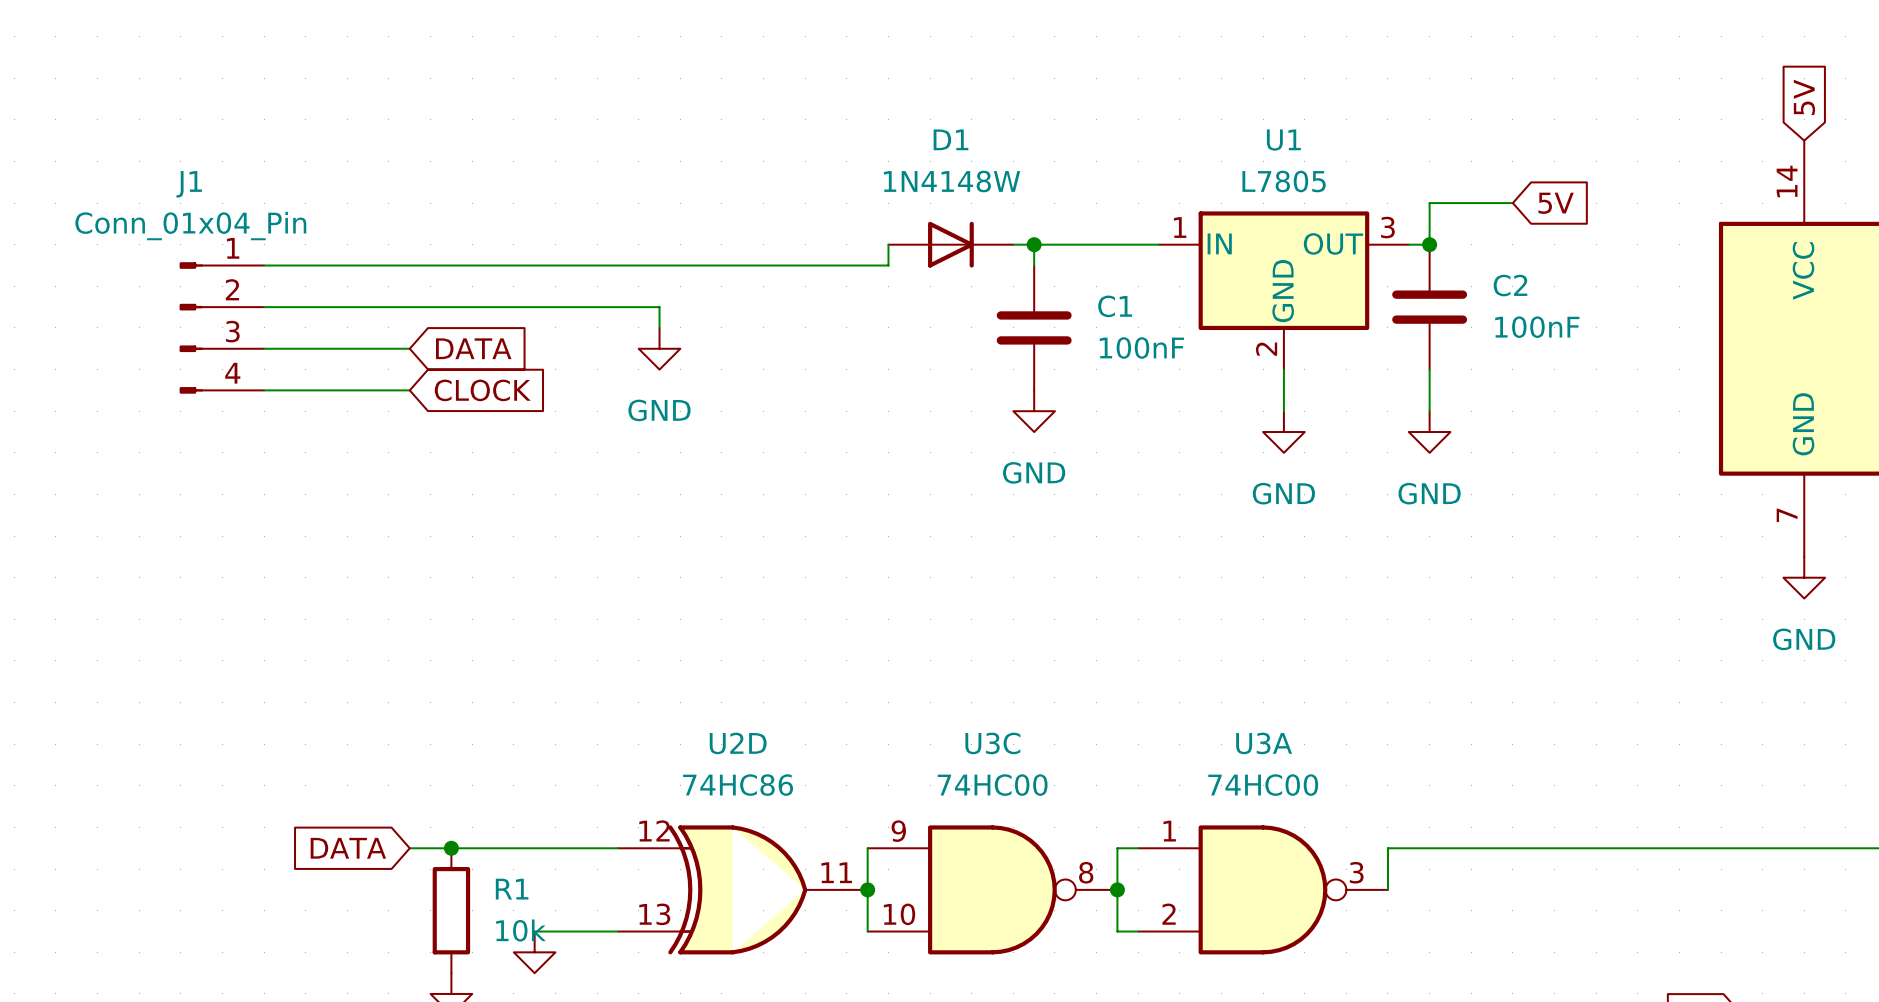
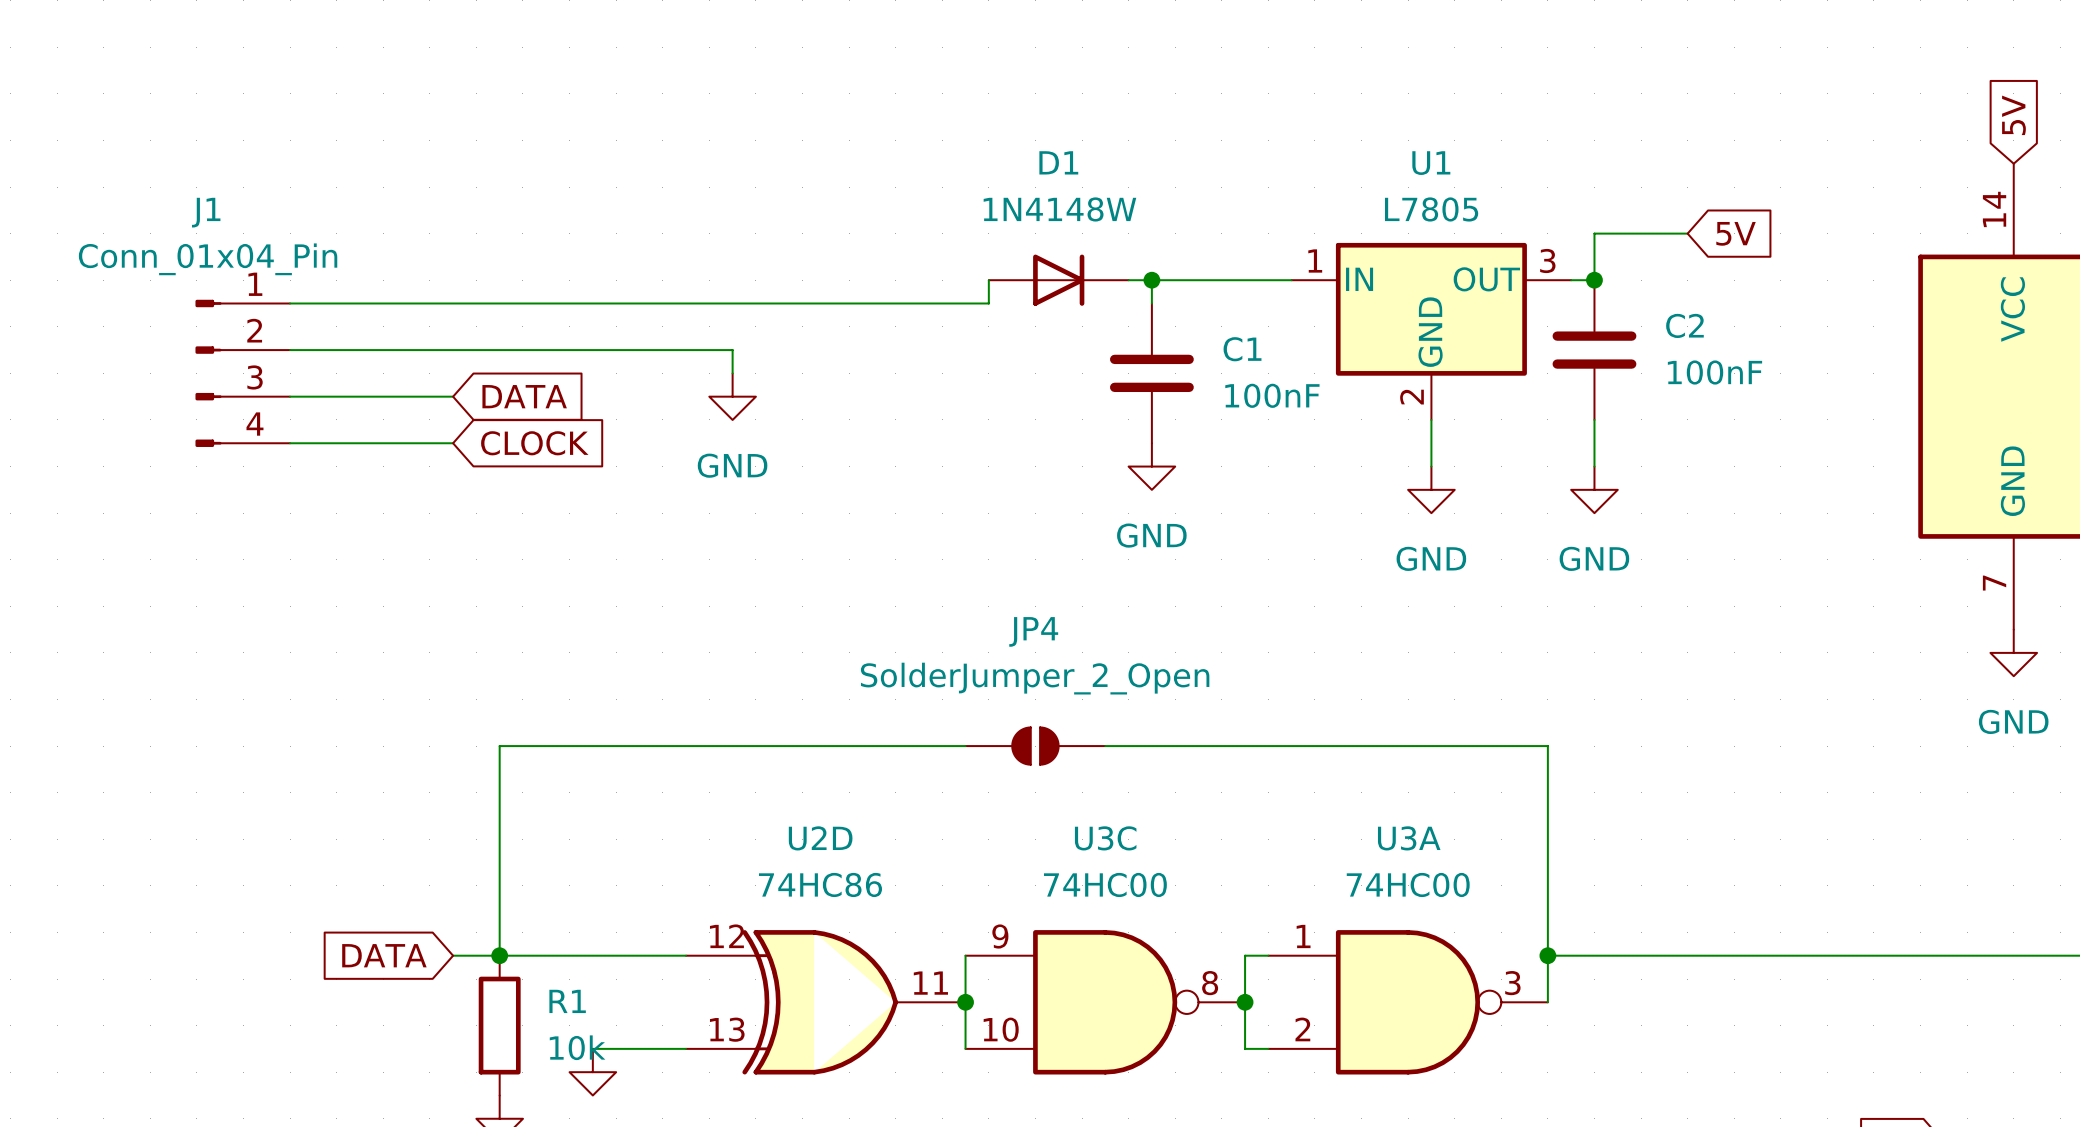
wire: none -> (965, 746) (499, 746) (499, 955)
JP4: none -> SolderJumper_2_Open (1035, 746)
wire: none -> (1105, 746) (1547, 746) (1547, 955)
junction: none -> (1547, 955)

